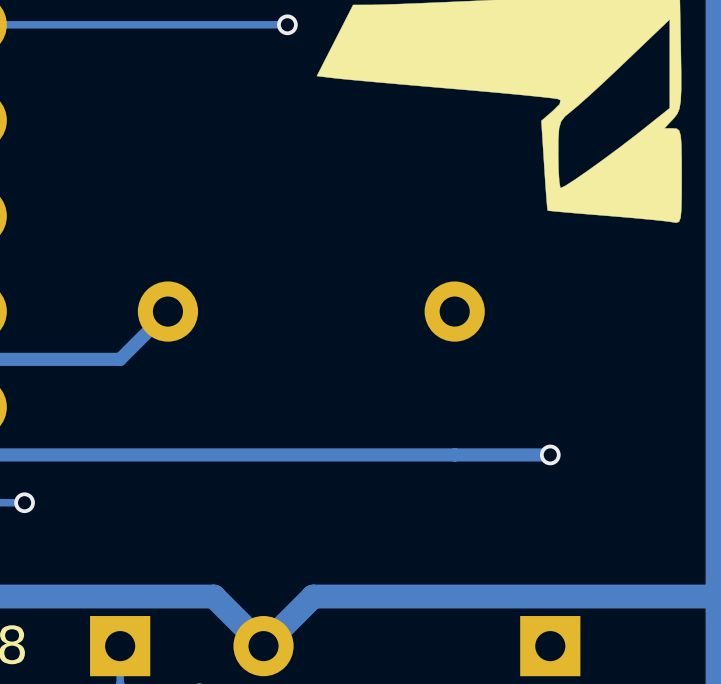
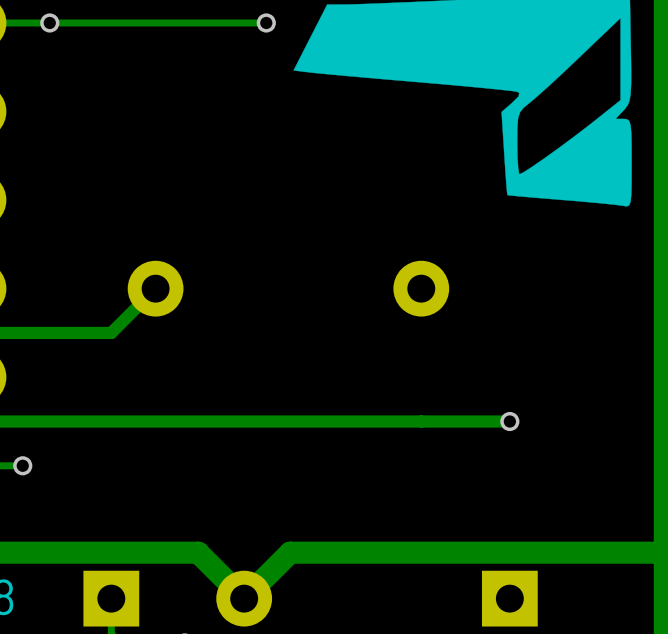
via: none -> (49, 22)

